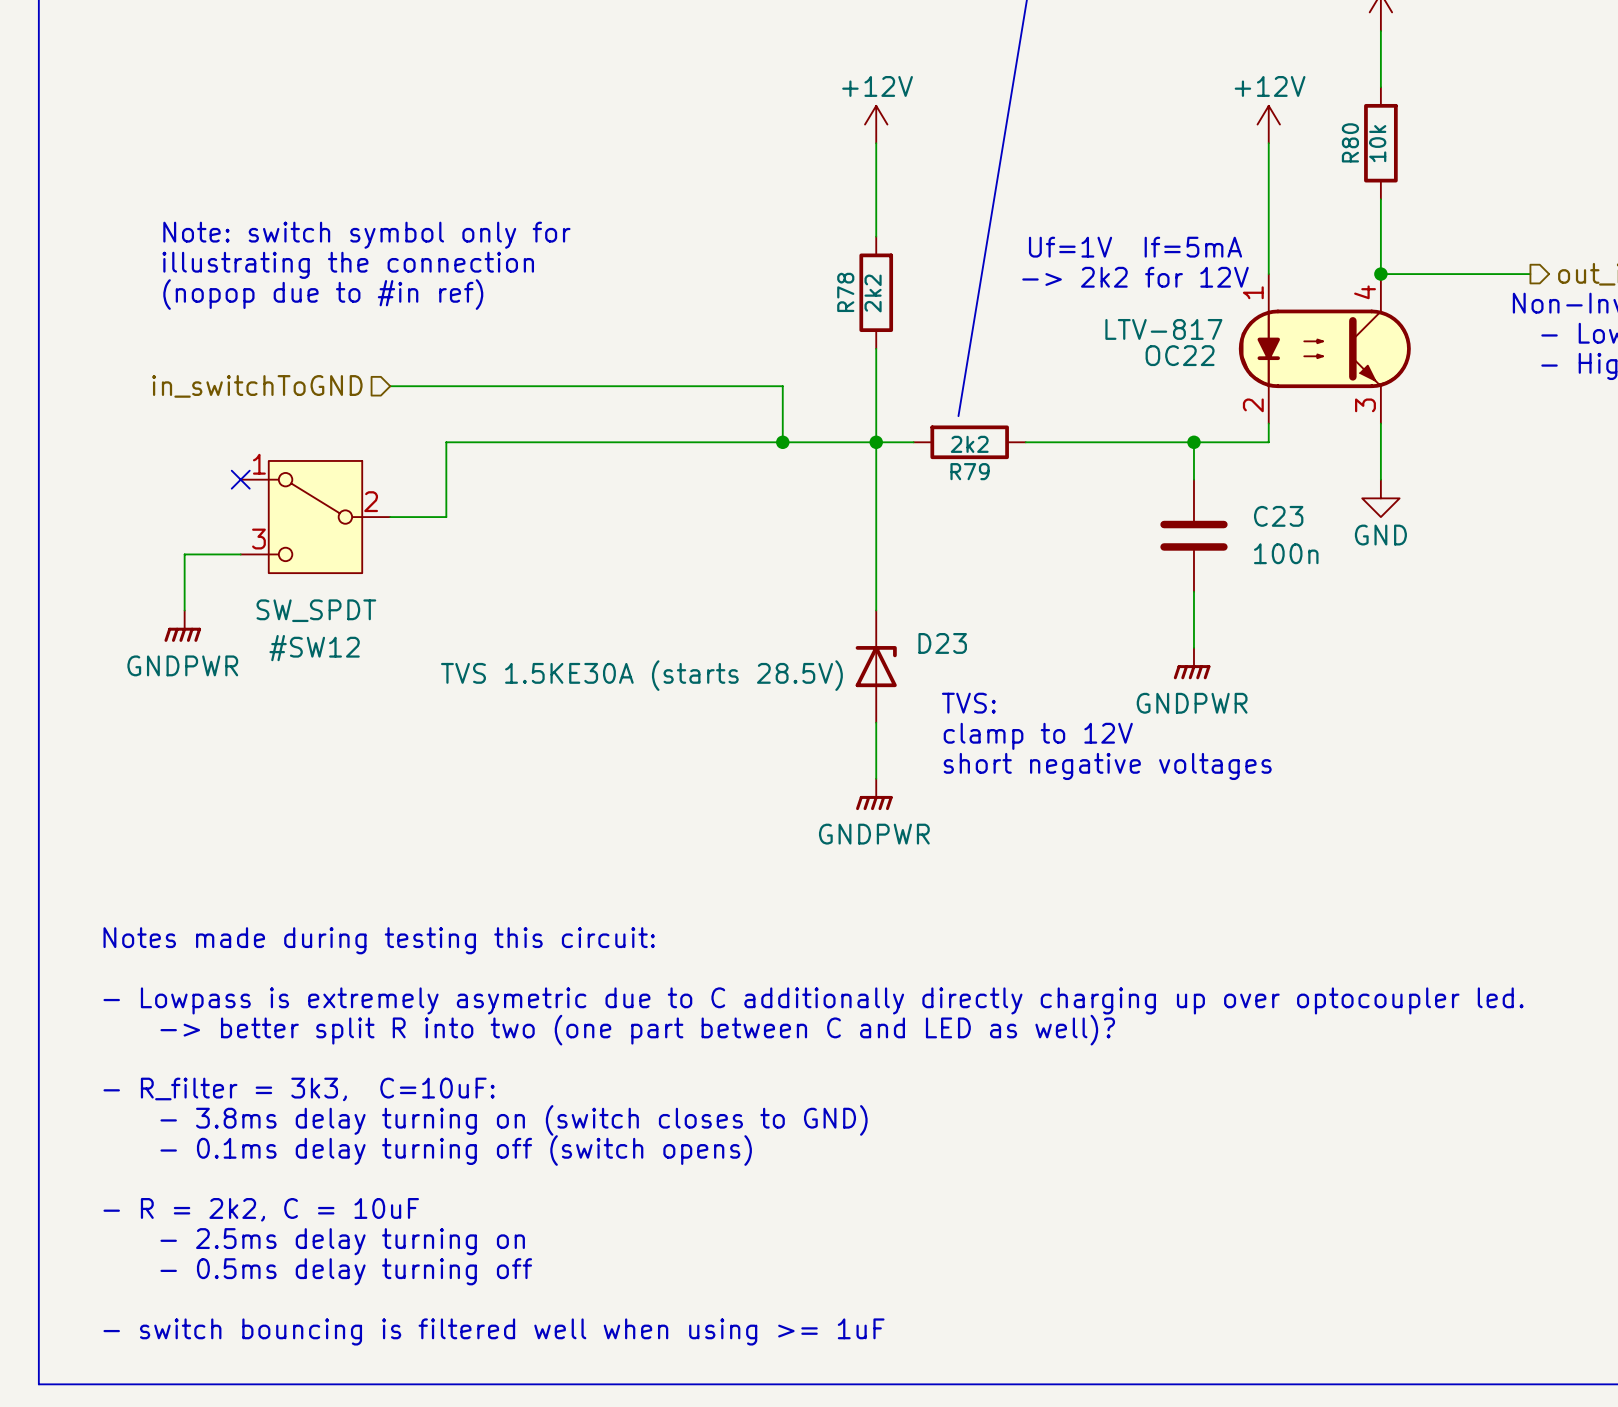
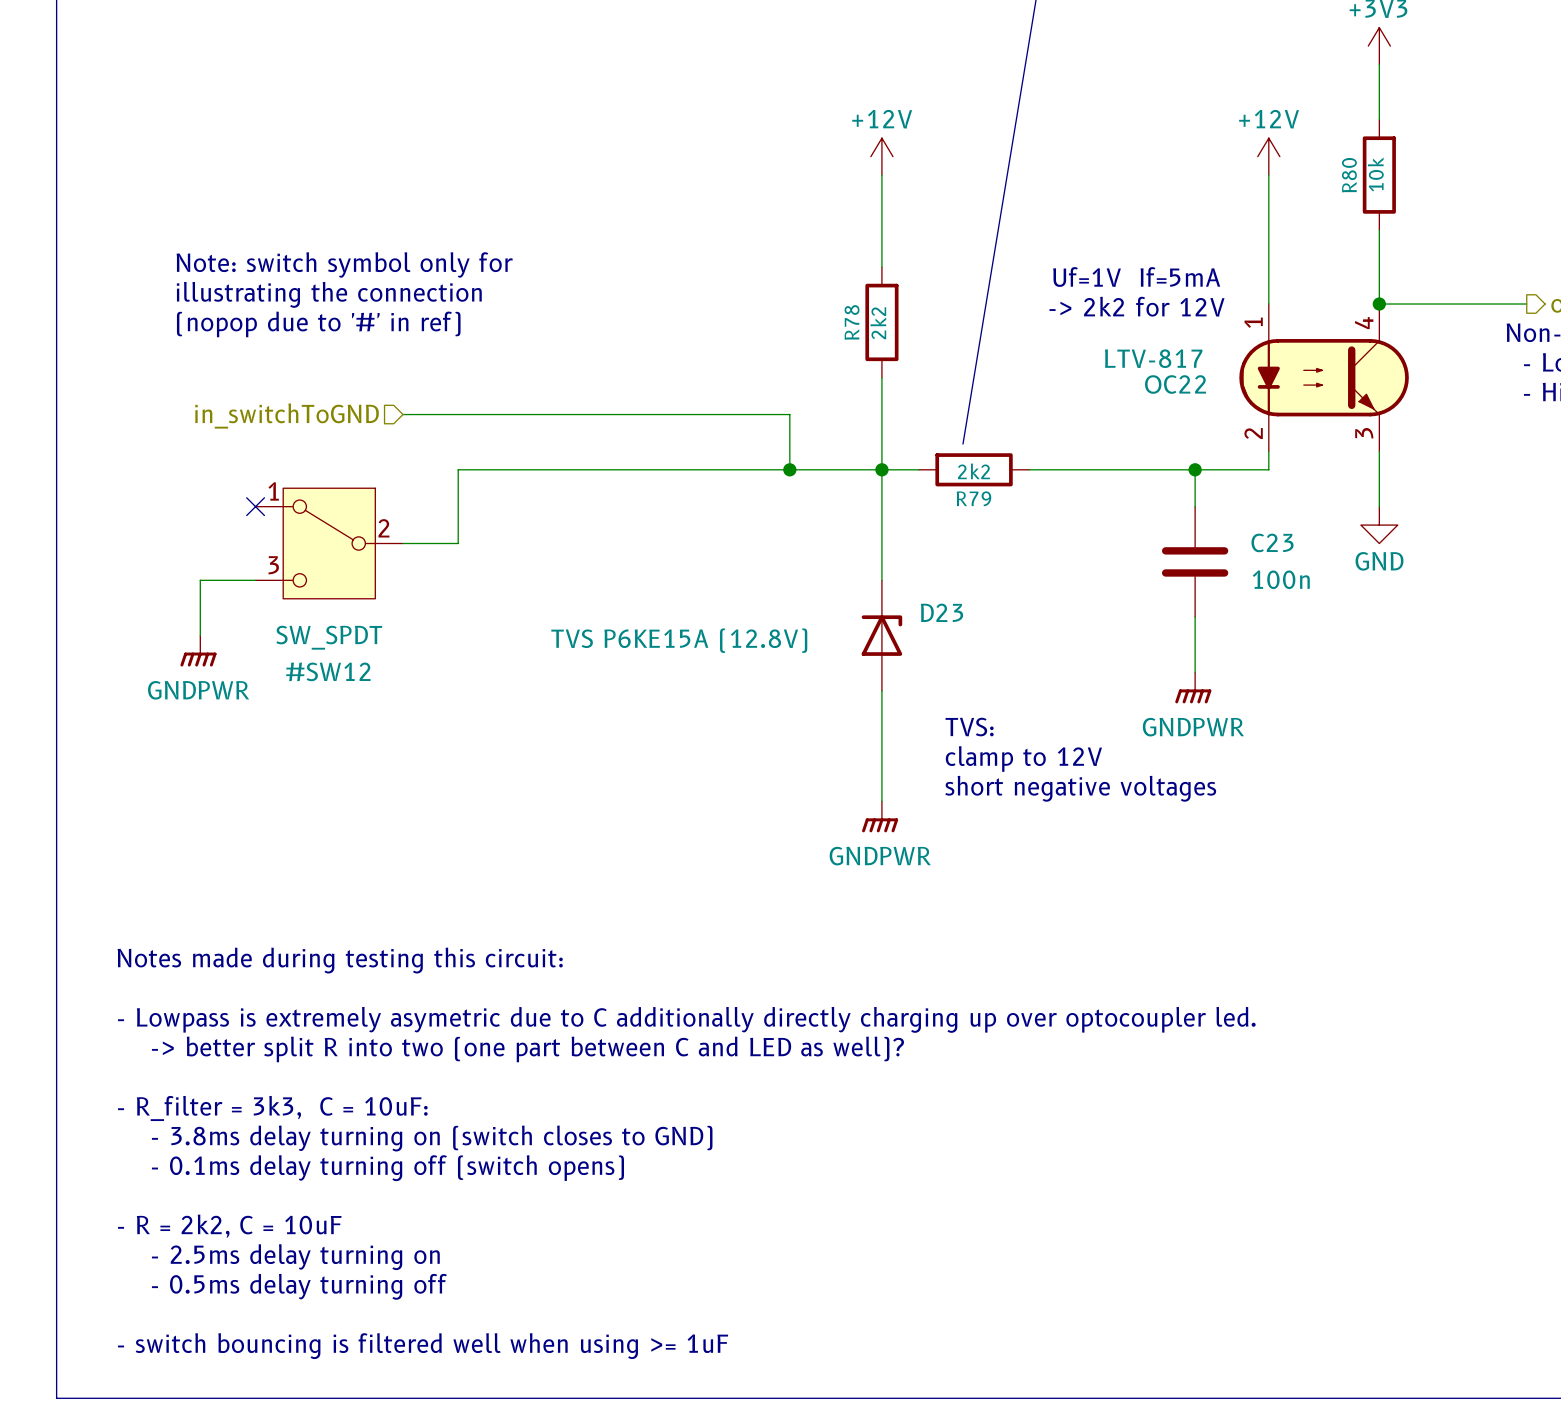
text: (nopop due to #in ref) (323, 294) -> (nopop due to '#' in ref) (318, 324)
D23 position: (876, 666) -> (881, 635)
D23 value: TVS 1.5KE30A (starts 28.5V) (641, 675) -> TVS P6KE15A (12.8V) (679, 640)
text: - R_filter = 3k3, C=10uF: (299, 1089) -> - R_filter = 3k3, C = 10uF: (272, 1108)

